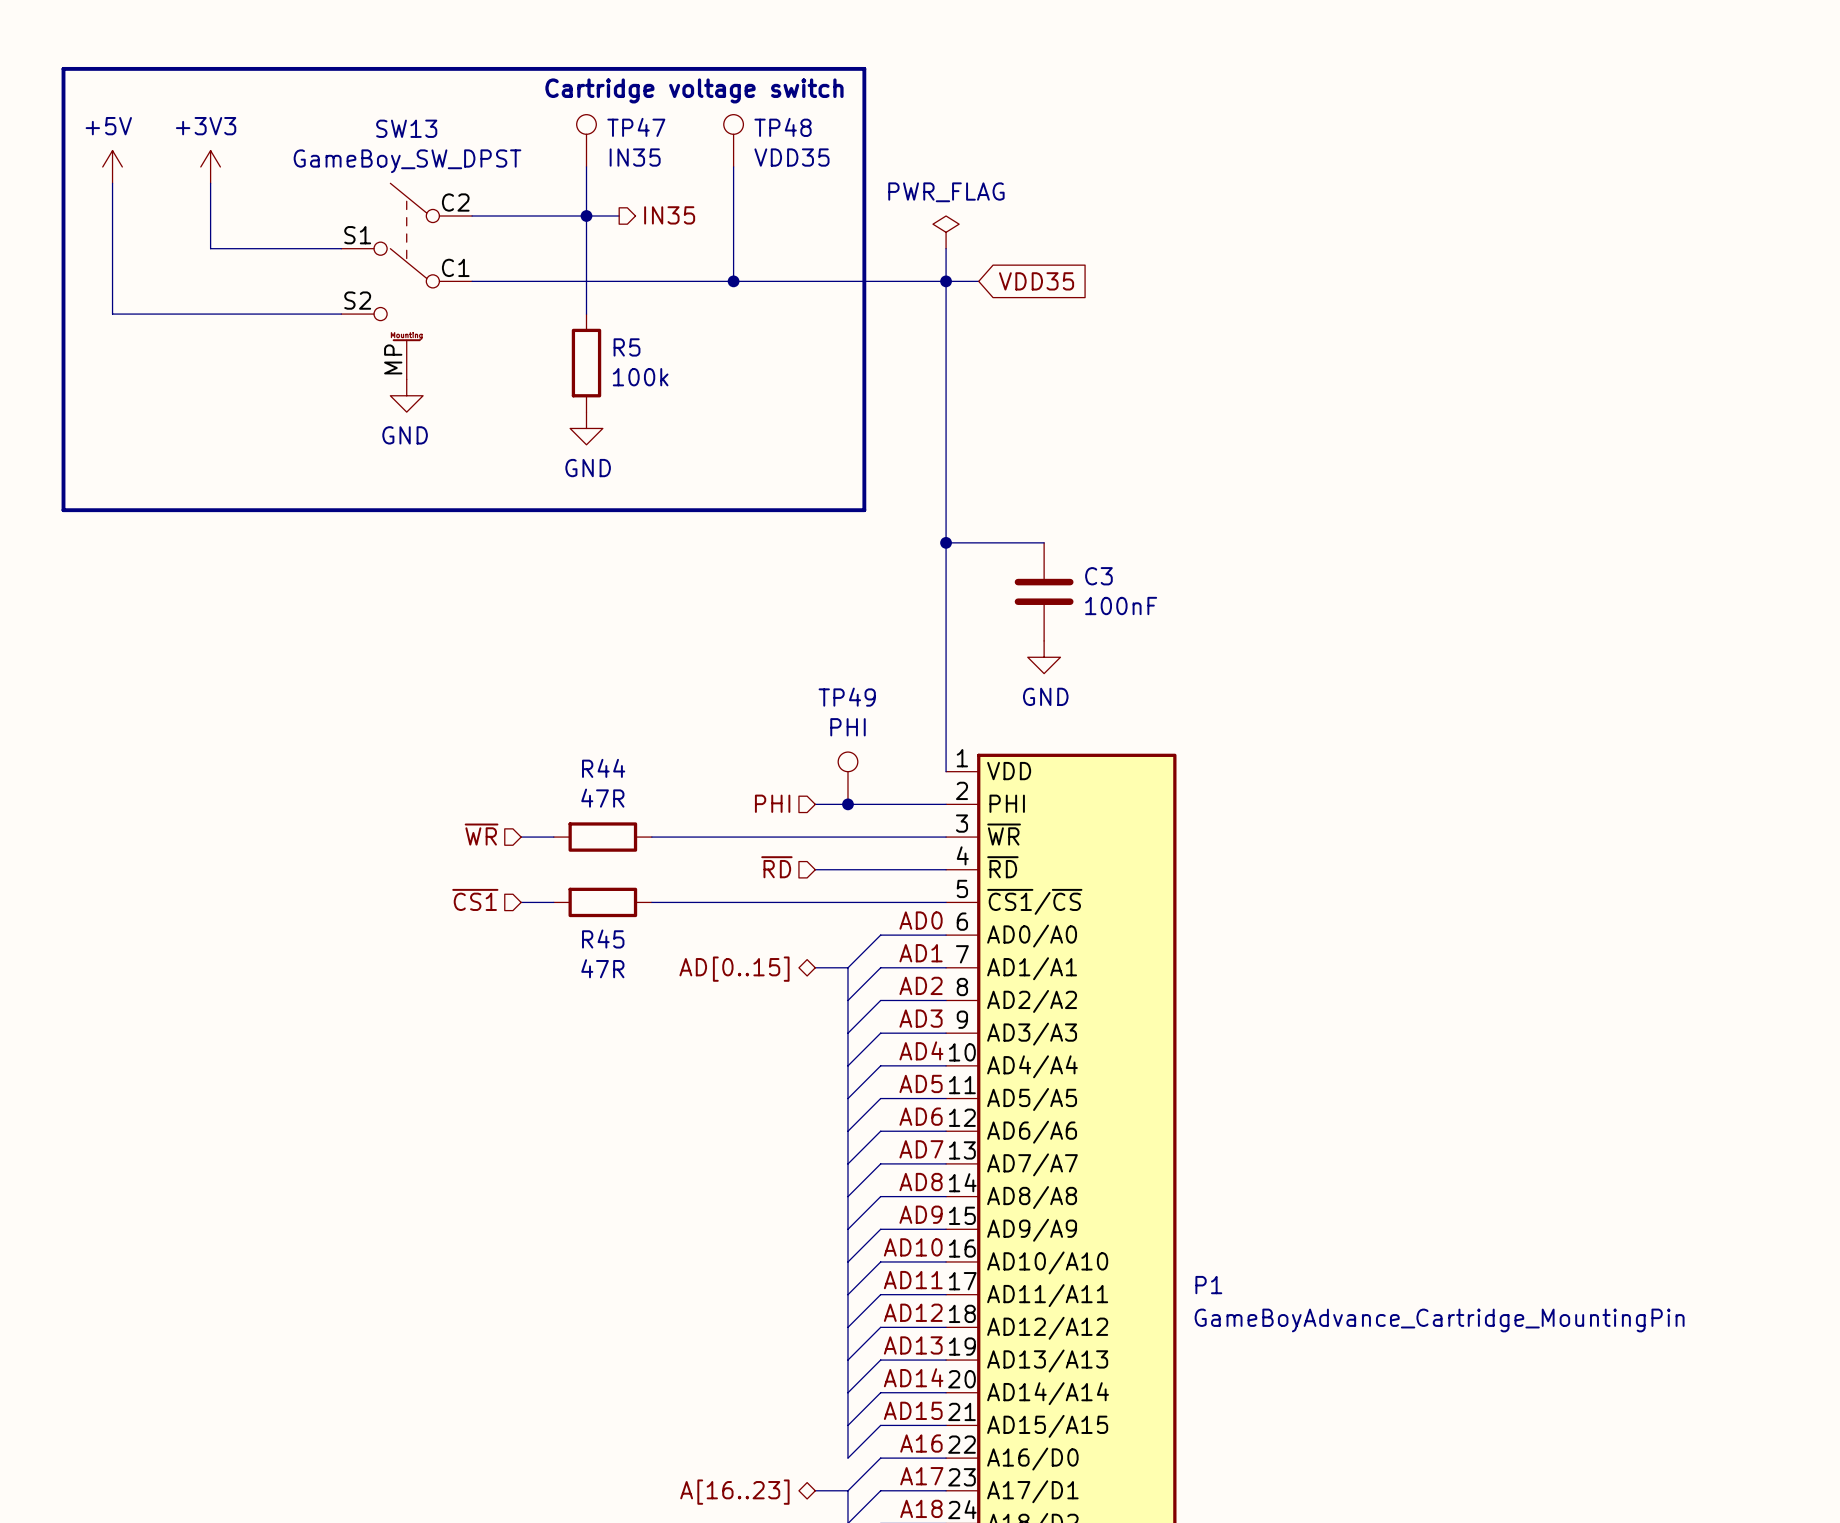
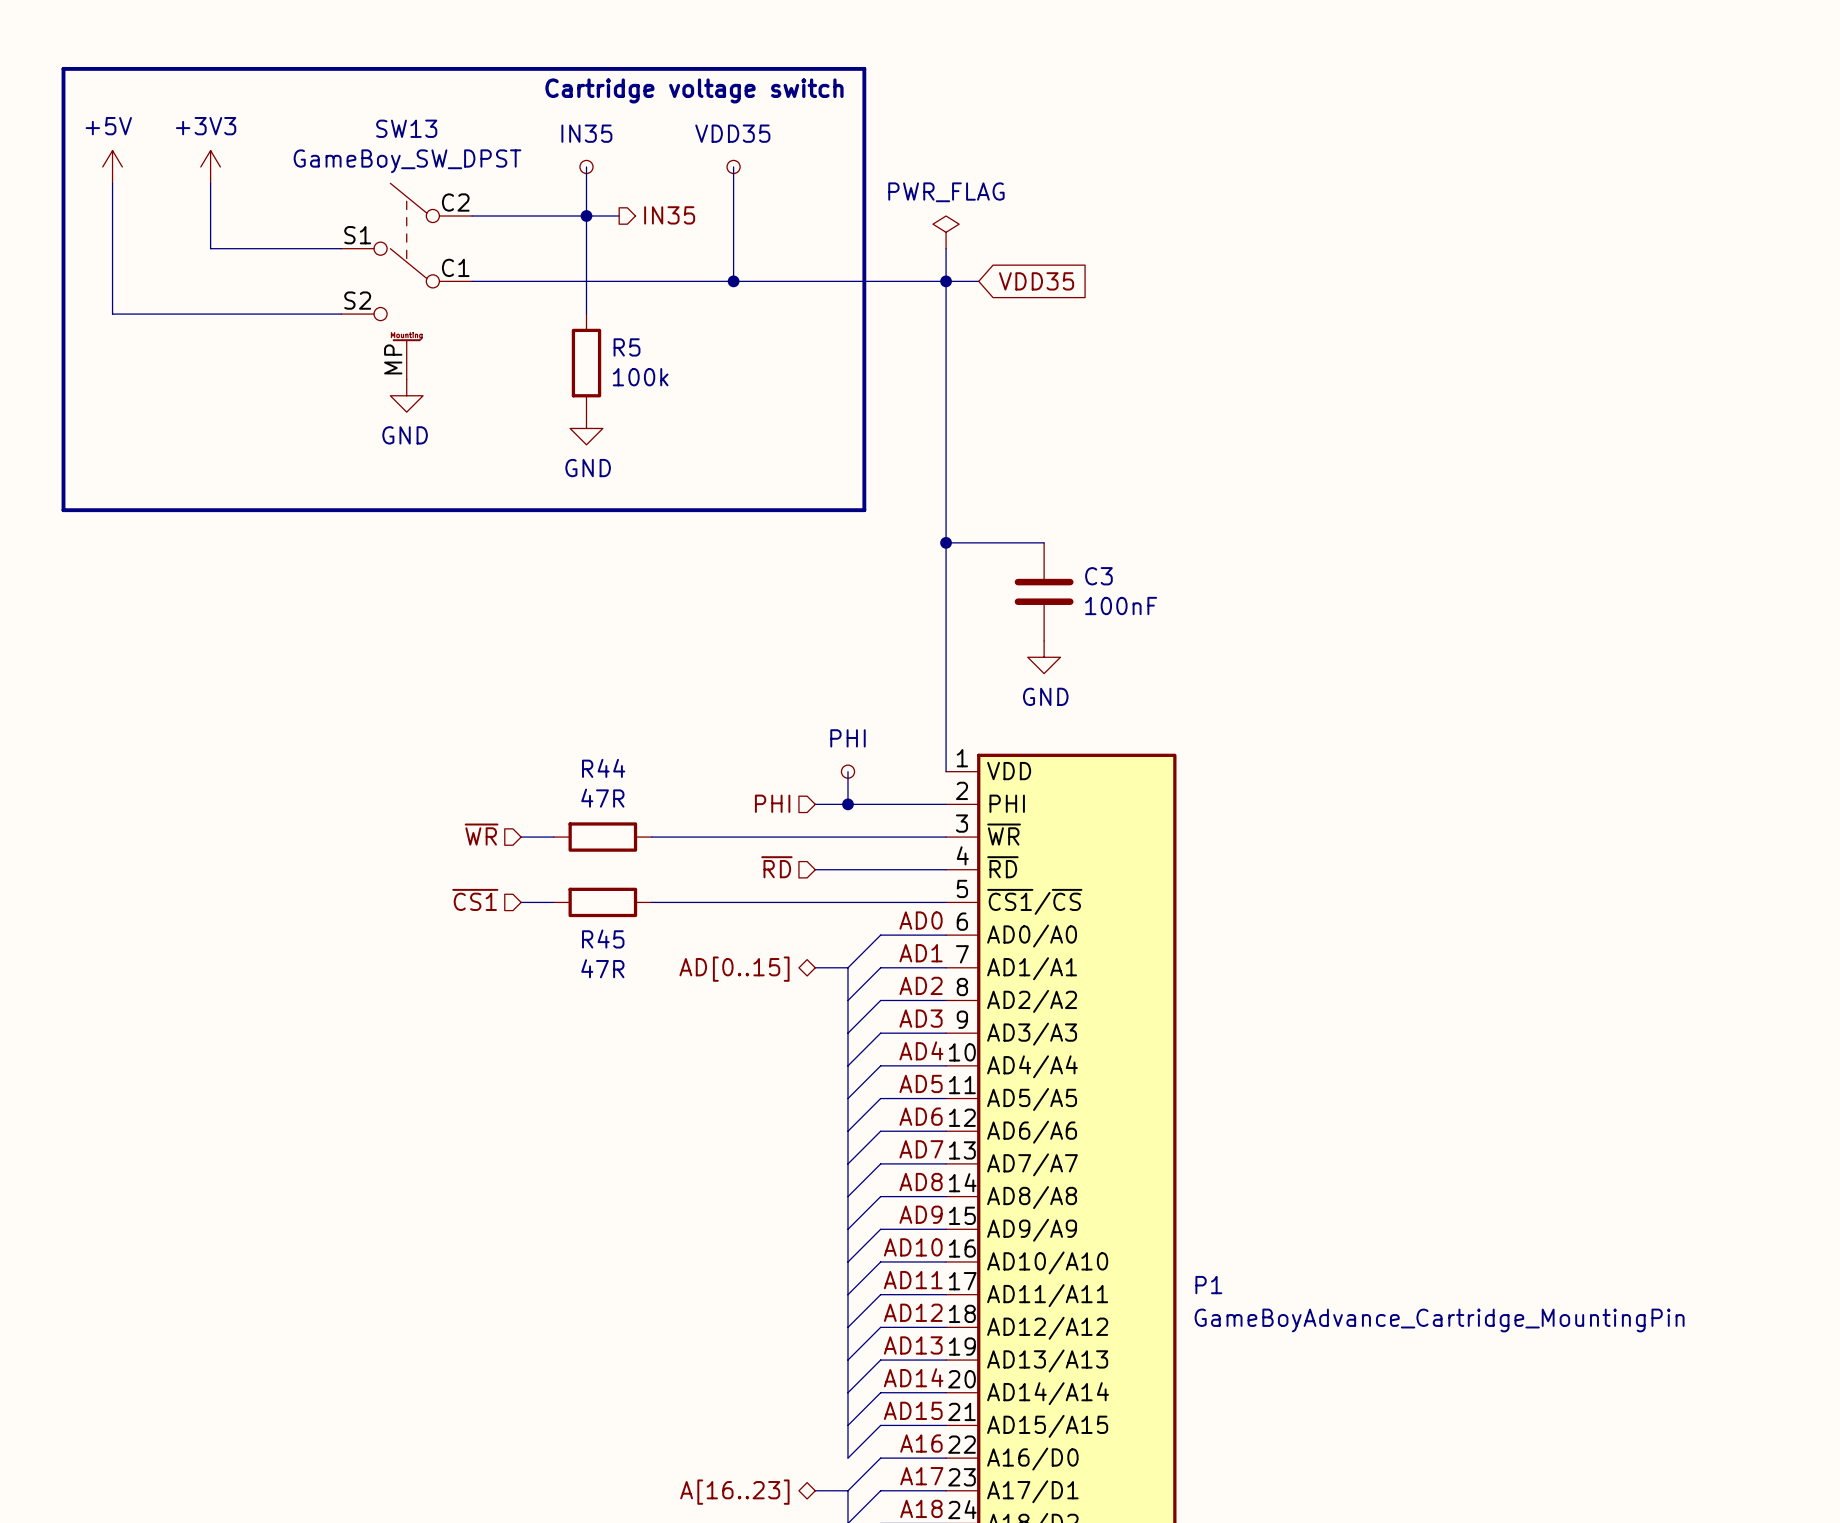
TP47: IN35 (586, 140) -> none
TP48: VDD35 (733, 140) -> none
part: none -> IN35 (586, 166)
part: none -> VDD35 (733, 166)
part: none -> PHI (847, 771)
TP49: PHI (847, 778) -> none

